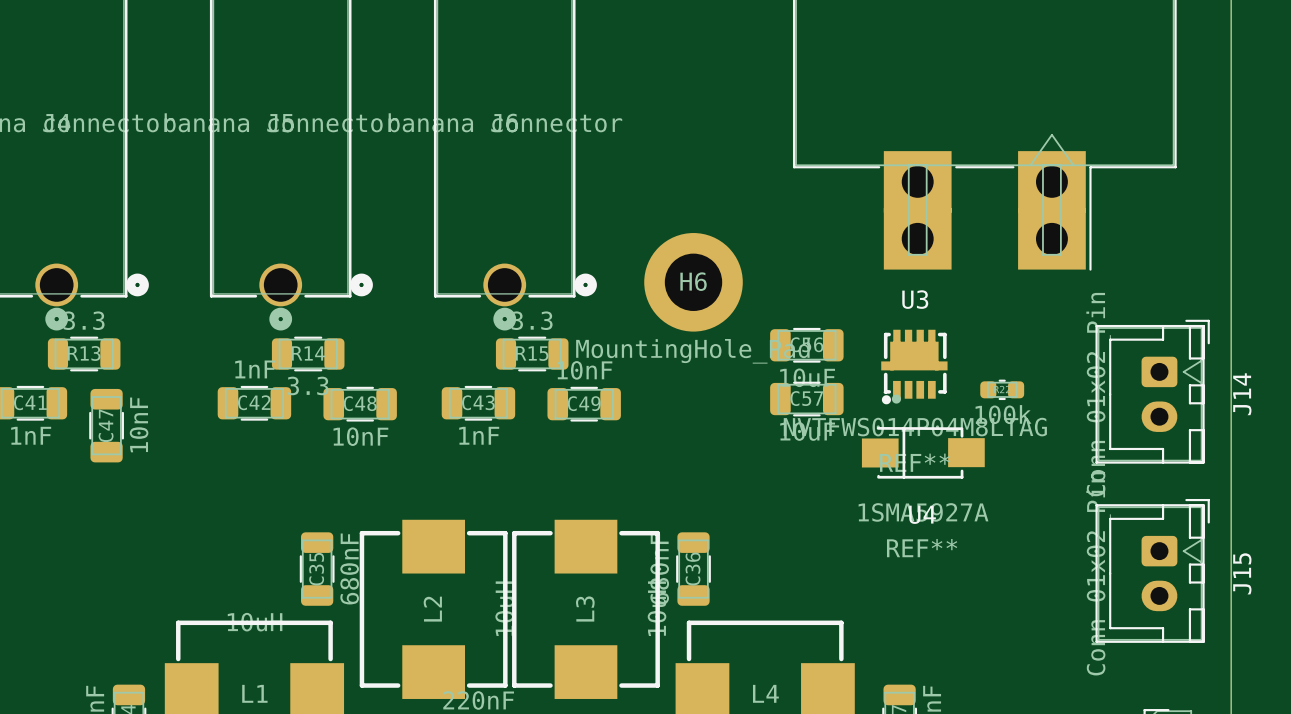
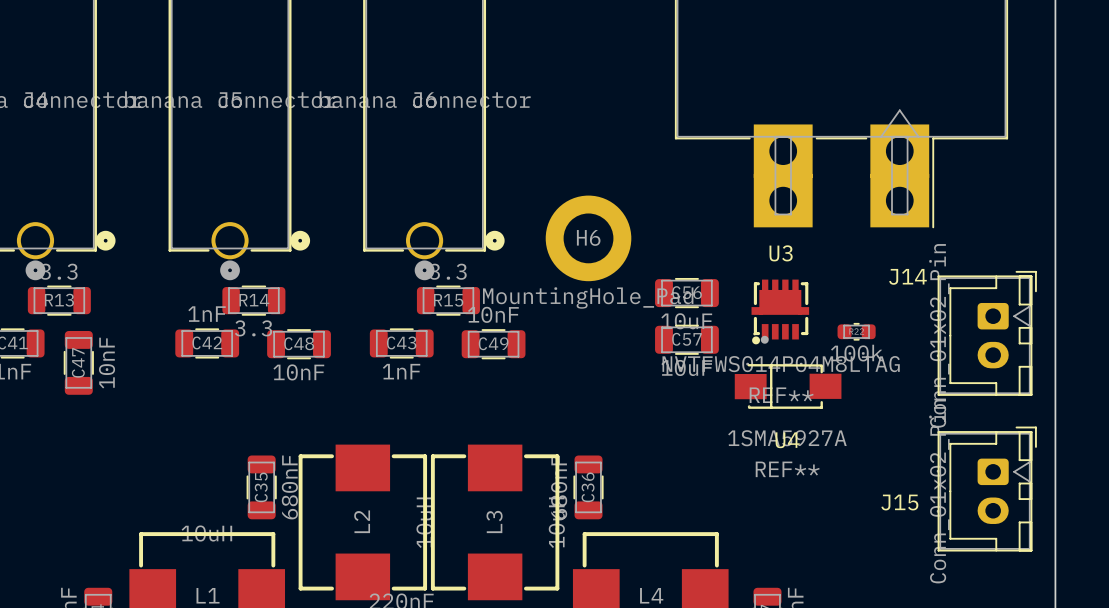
J14 name rotation: 0° (1242, 394) -> 90° clockwise (907, 276)
J14 name position: J14 (1242, 394) -> J14 (907, 276)
J15 name rotation: 0° (1242, 573) -> 90° clockwise (899, 502)
J15 name position: J15 (1242, 573) -> J15 (899, 502)

